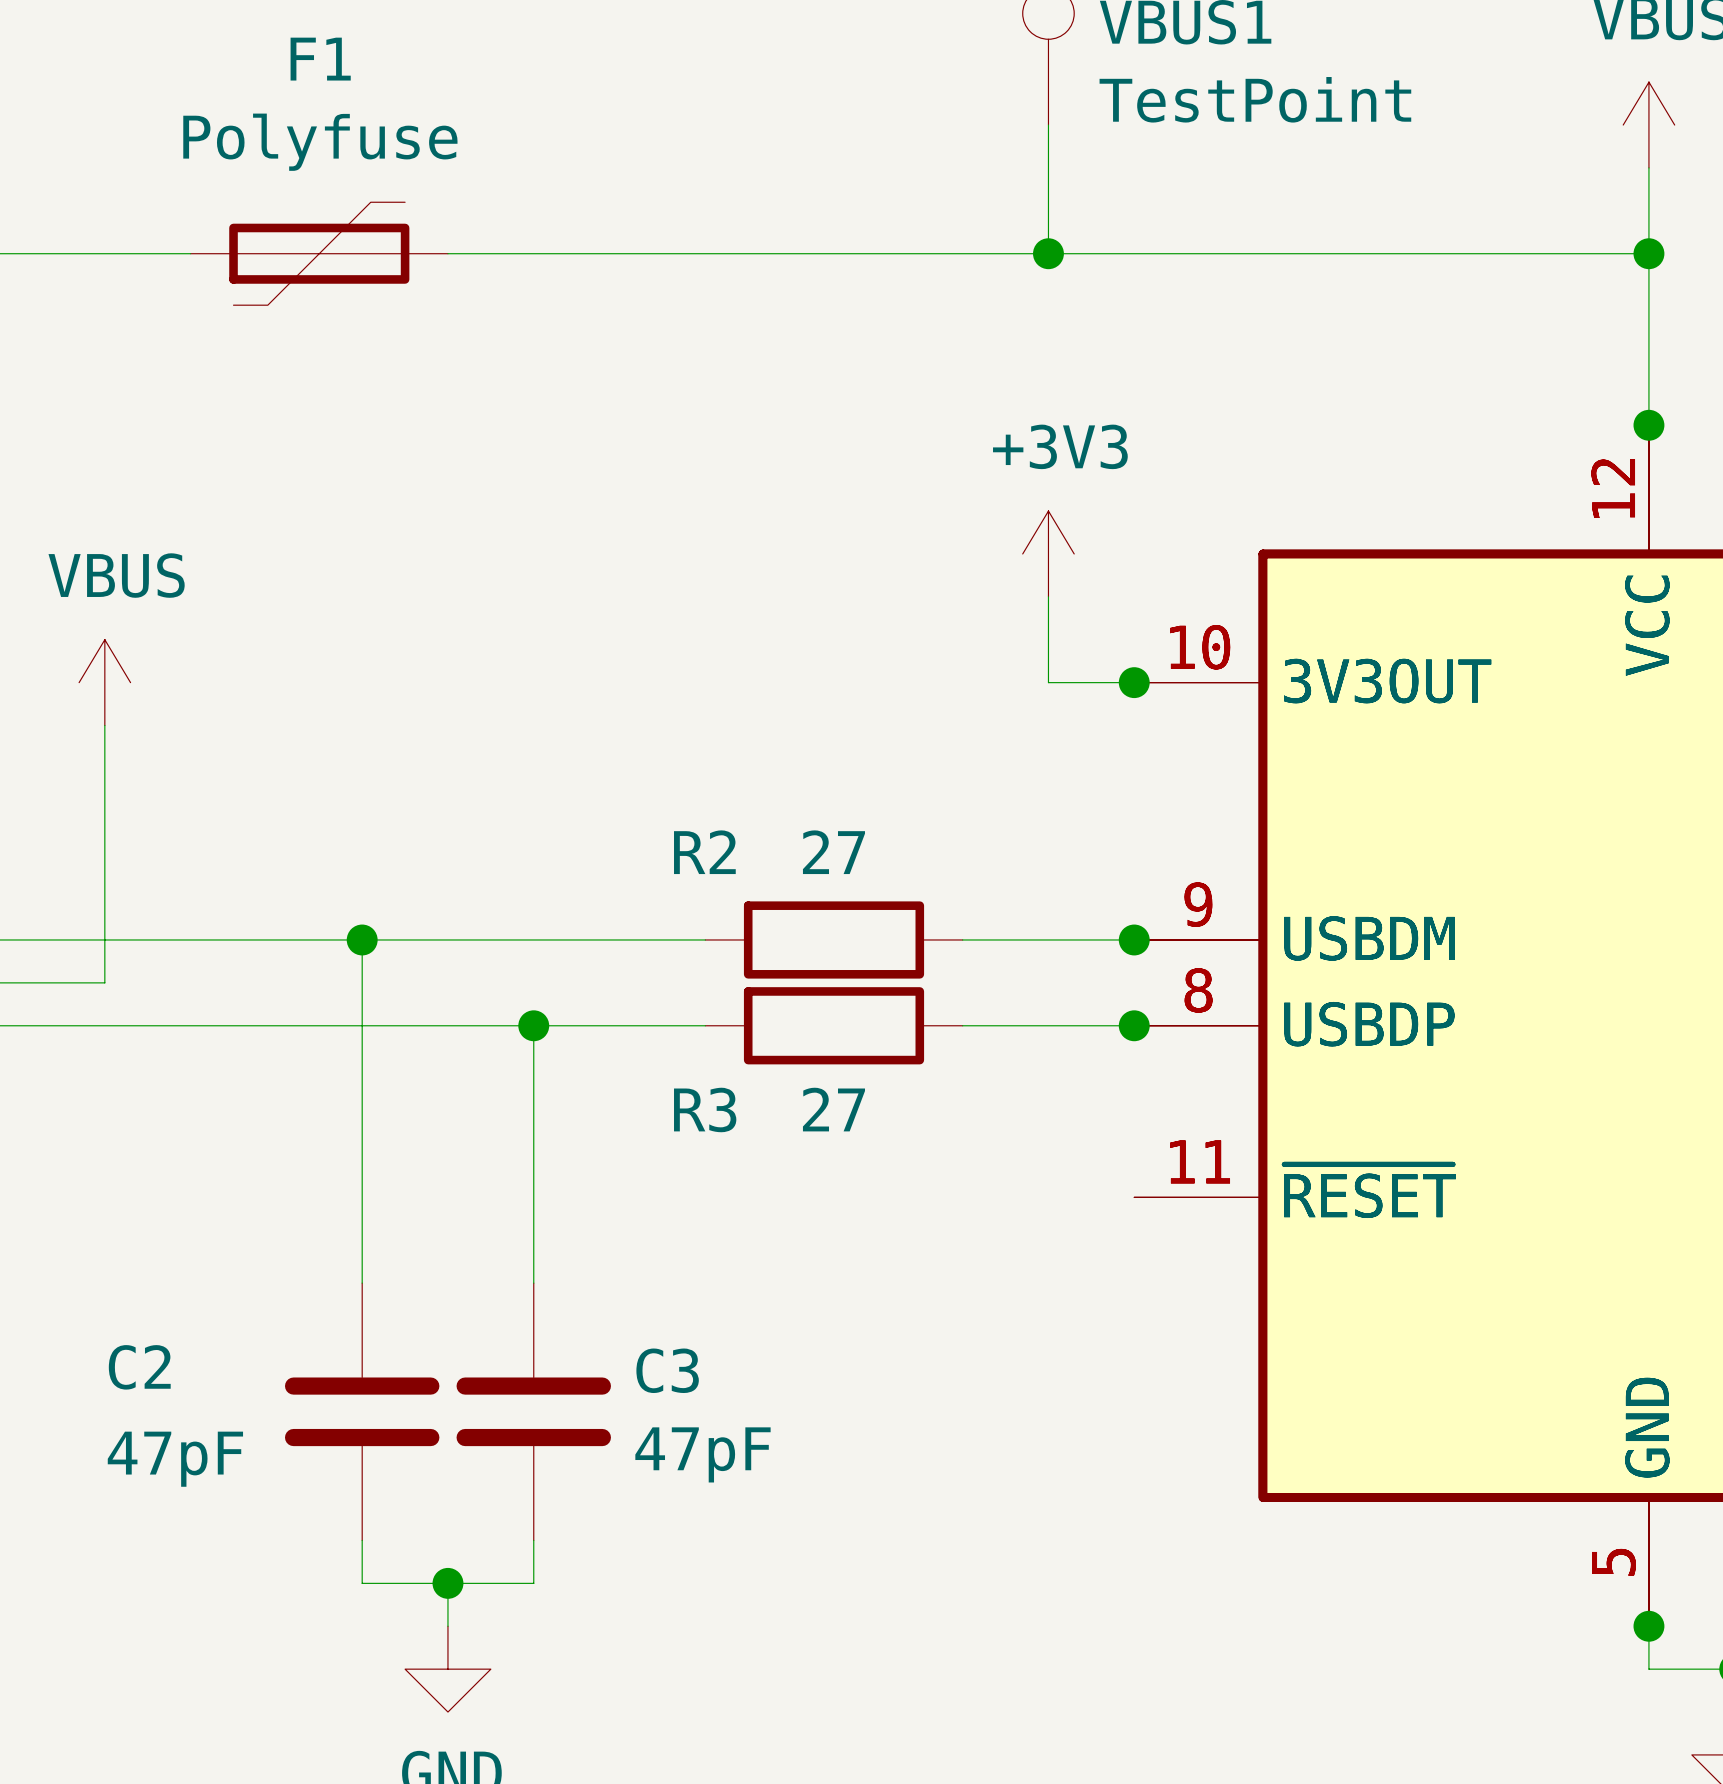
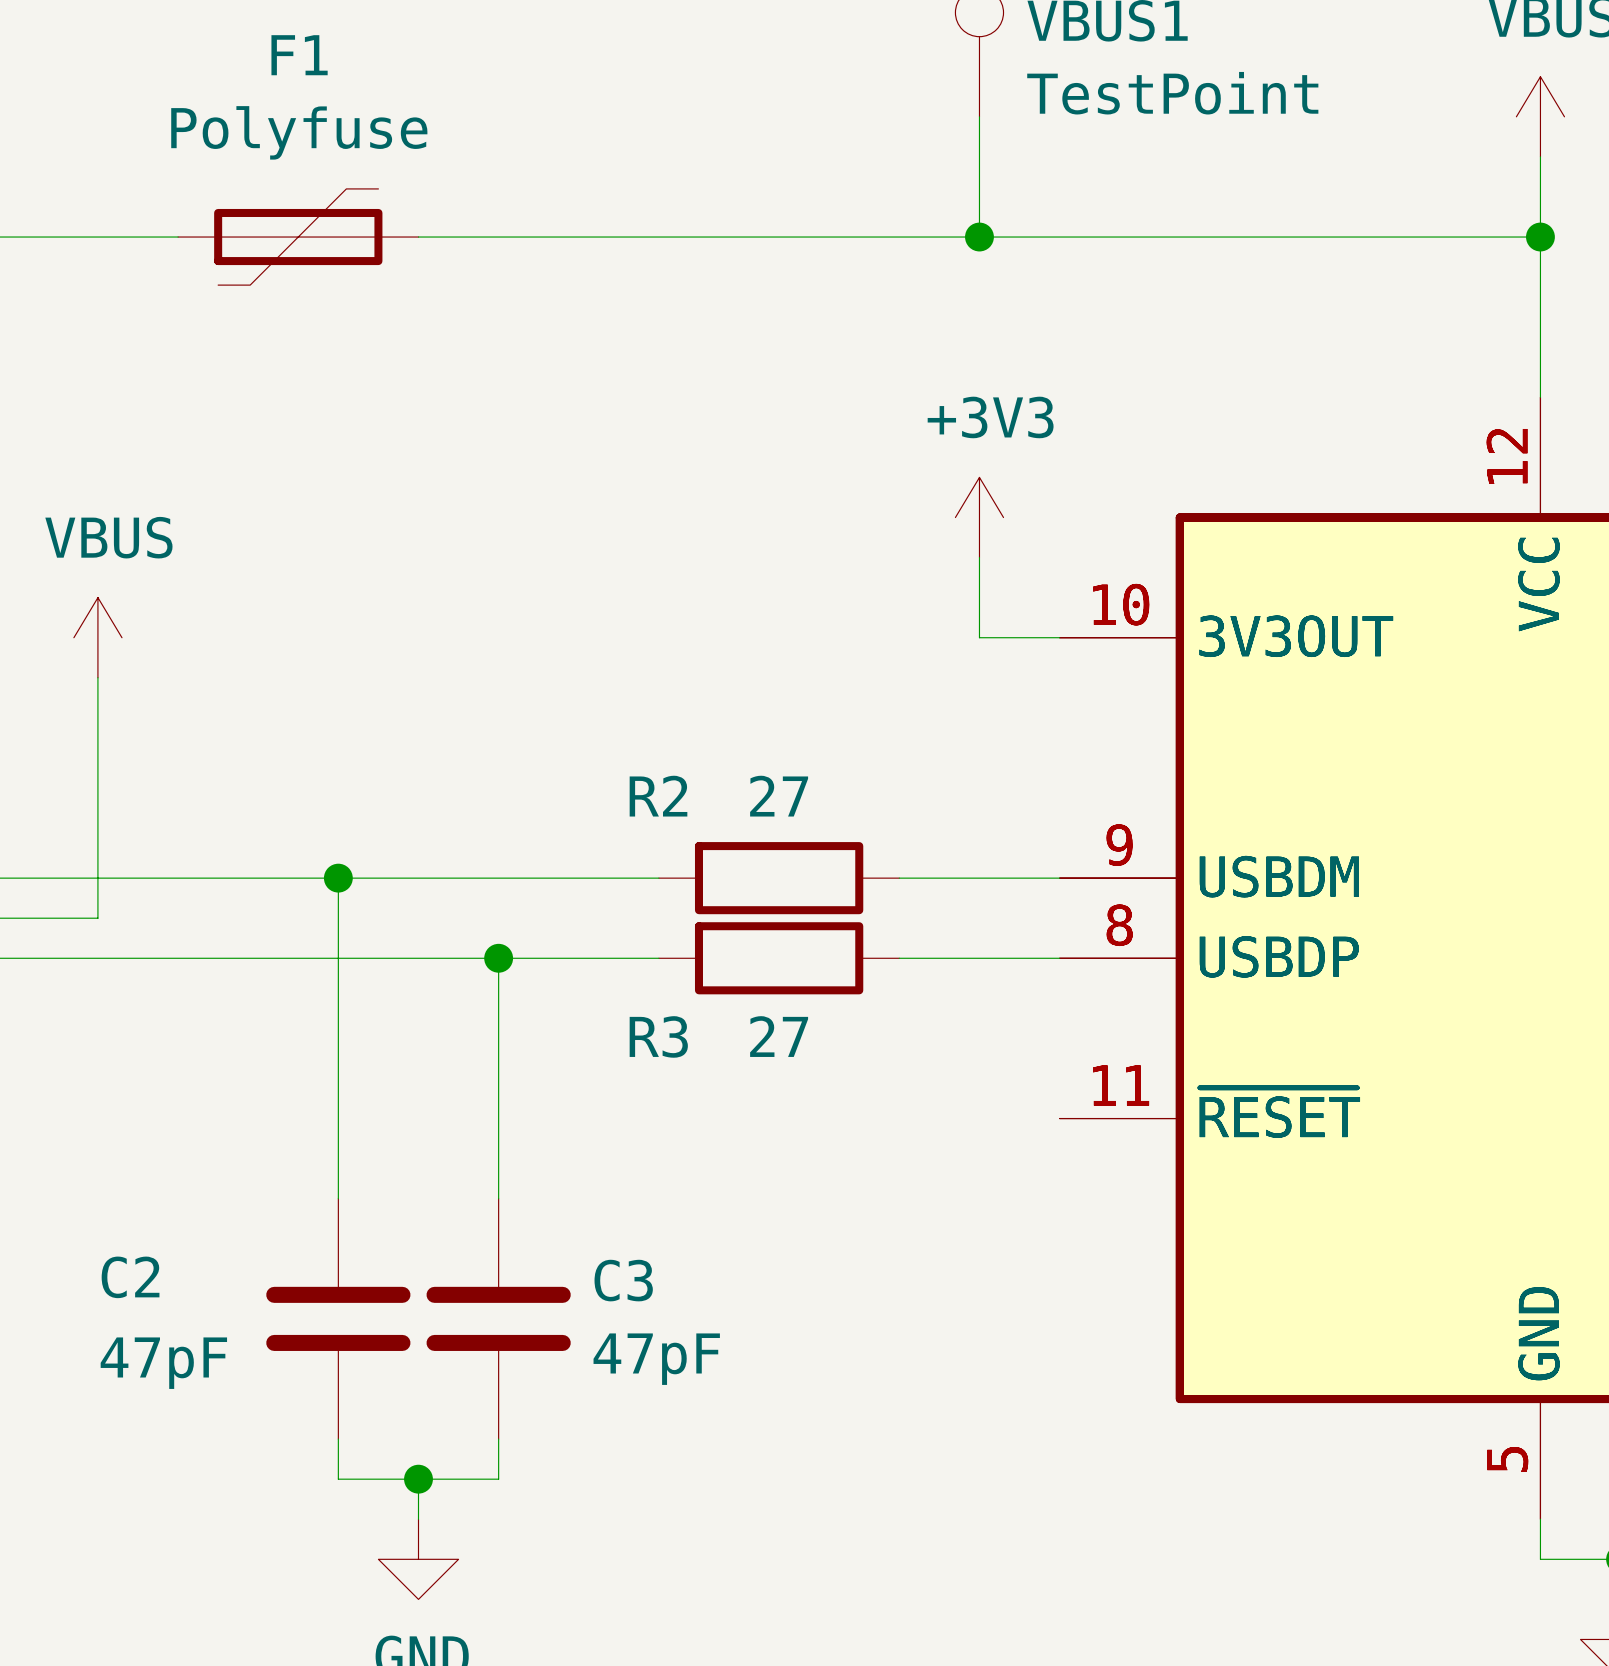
junction: (1648, 425) -> none
junction: (1134, 682) -> none
junction: (1134, 939) -> none
junction: (1134, 1025) -> none
junction: (1648, 1626) -> none

